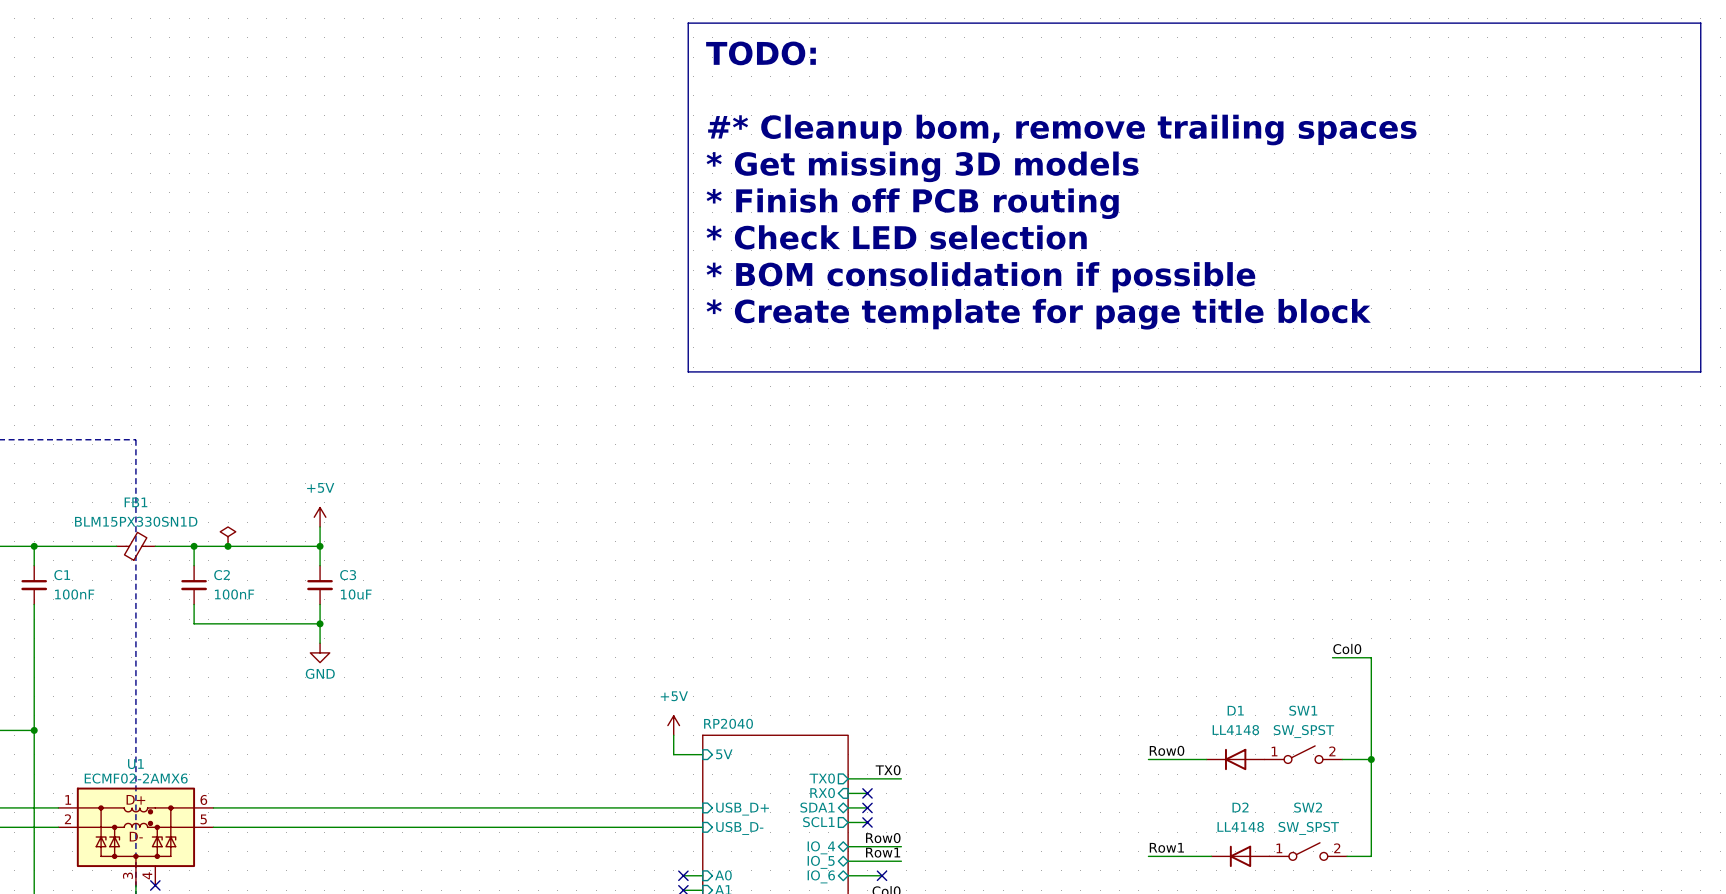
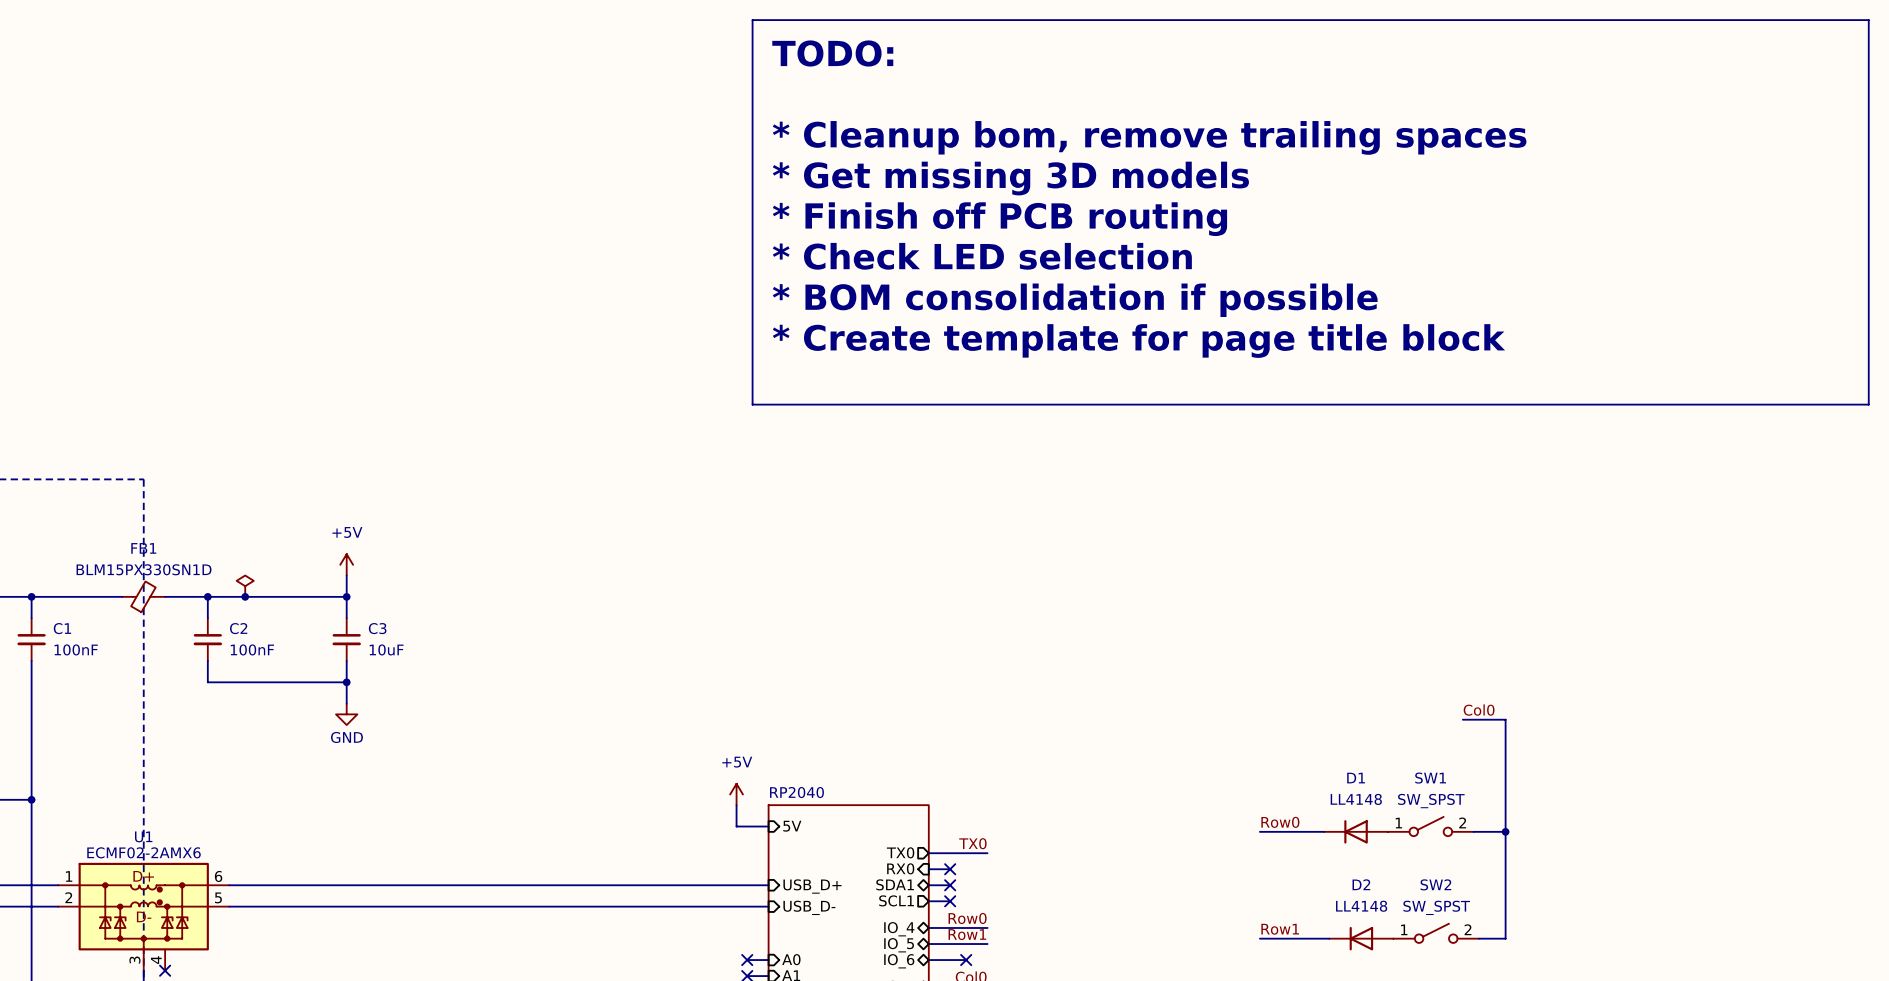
text: #* Cleanup bom, remove trailing spaces (1062, 130) -> * Cleanup bom, remove trailing spaces (1149, 137)

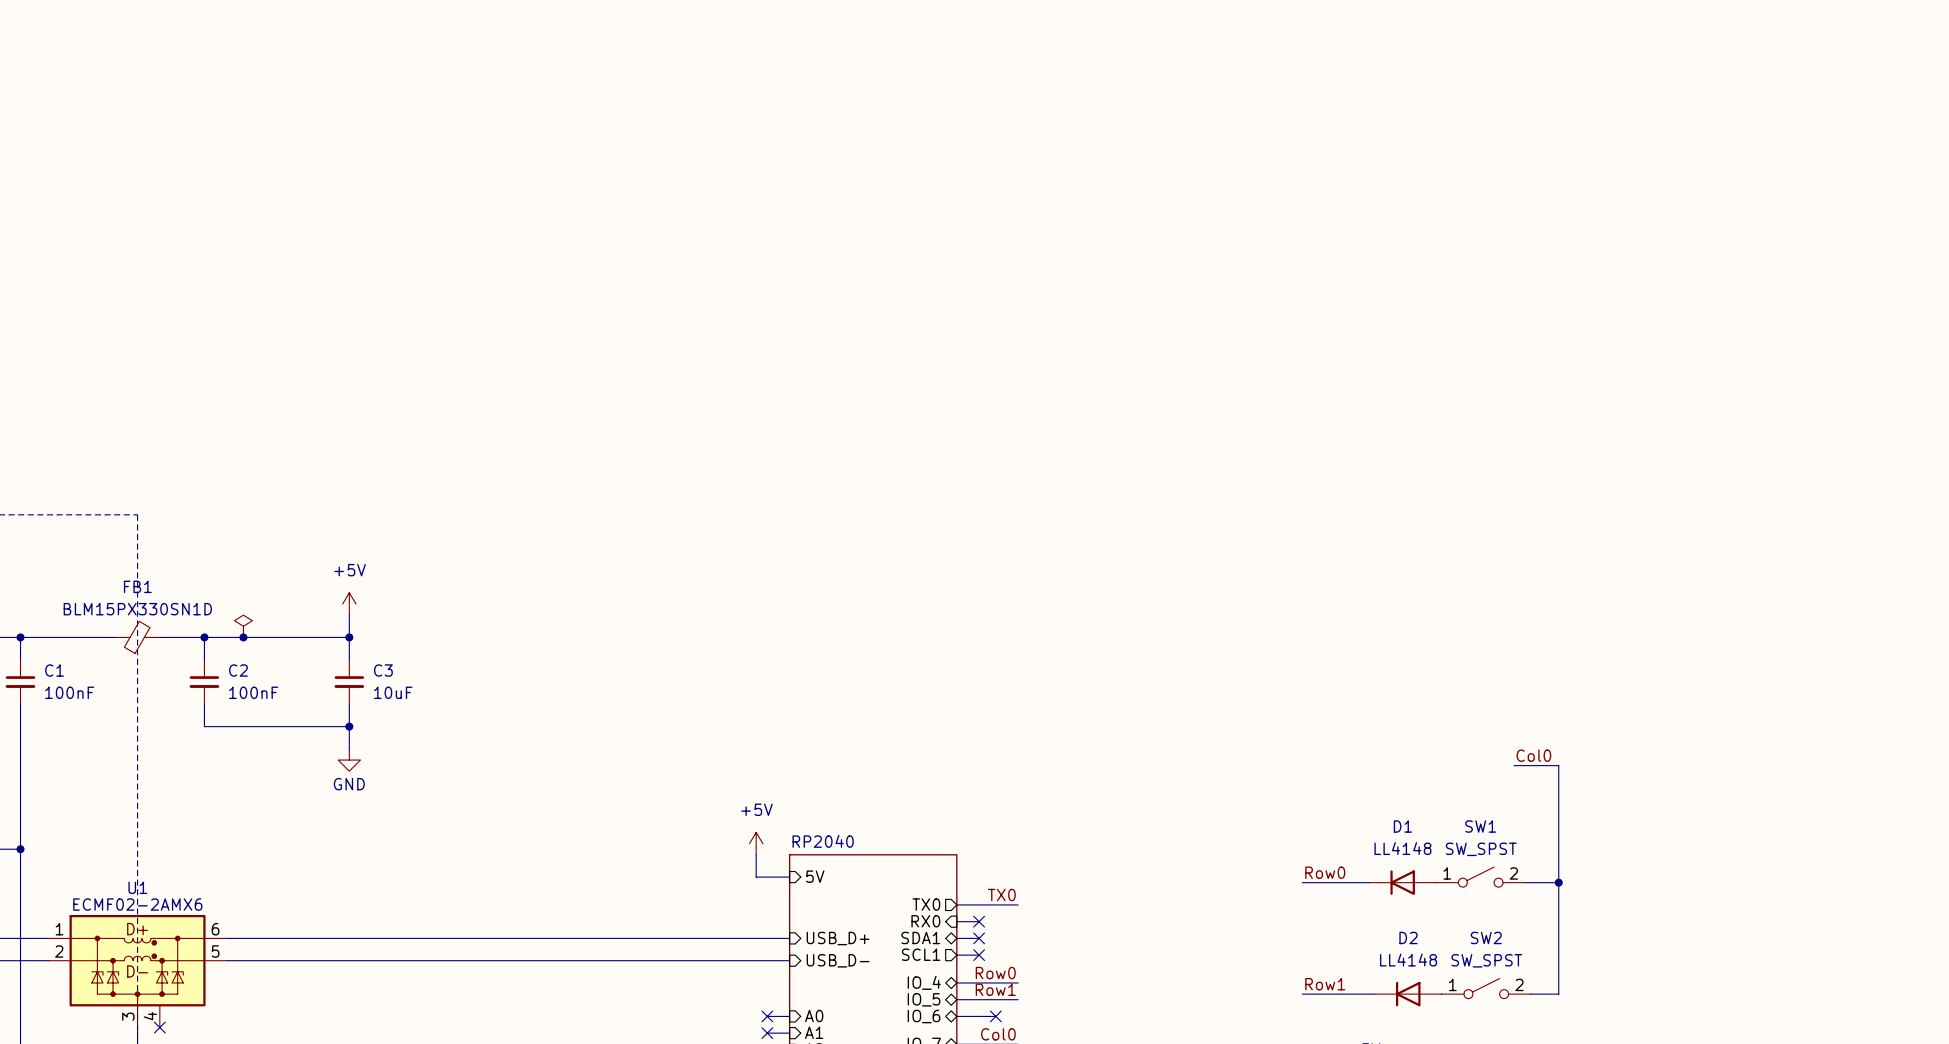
line: (752, 20) (1868, 20) (1868, 404) (752, 404) (752, 20) -> none
text: TODO: (832, 53) -> none
text: * Cleanup bom, remove trailing spaces (1149, 137) -> none
text: * Get missing 3D models (1010, 178) -> none
text: * Finish off PCB routing (999, 219) -> none
text: * Check LED selection (982, 256) -> none
text: * BOM consolidation if possible (1075, 300) -> none
text: * Create template for page title block (1138, 341) -> none

